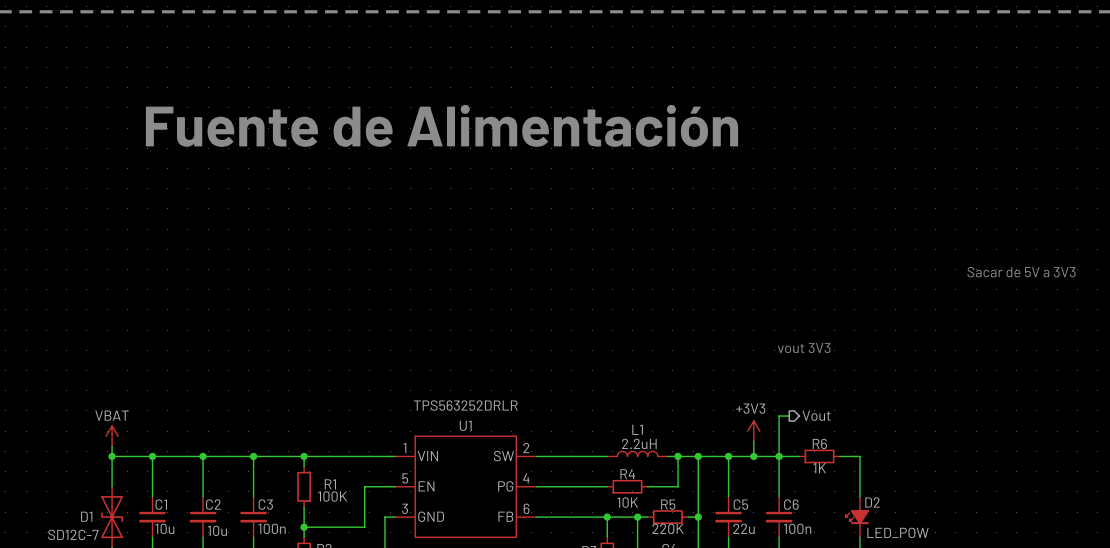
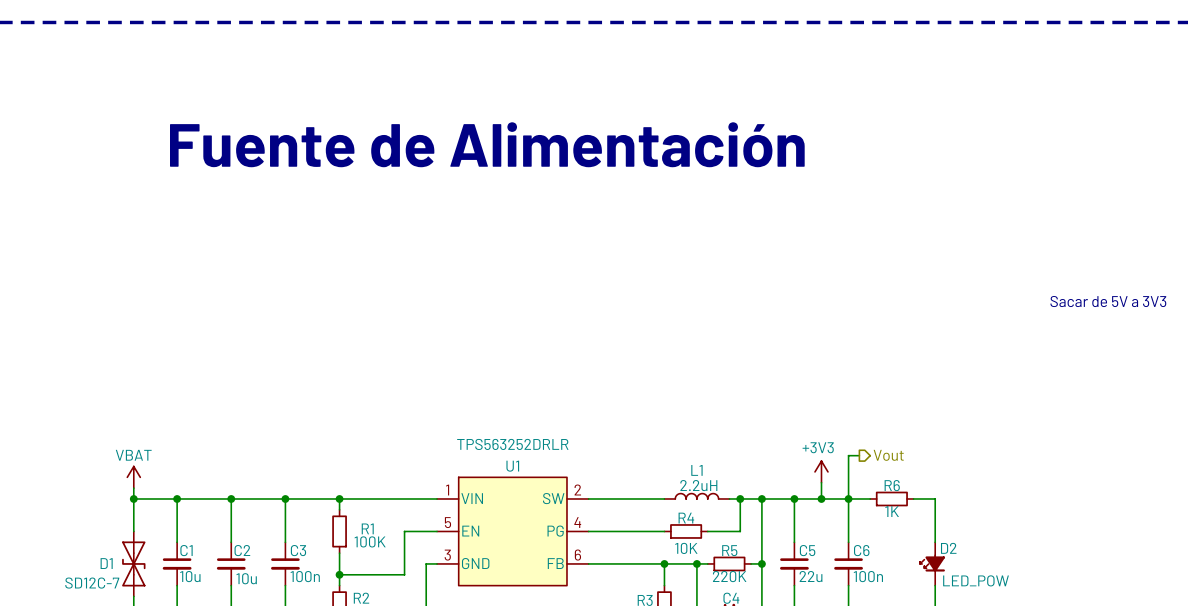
text: vout 3V3 (804, 348) -> none

